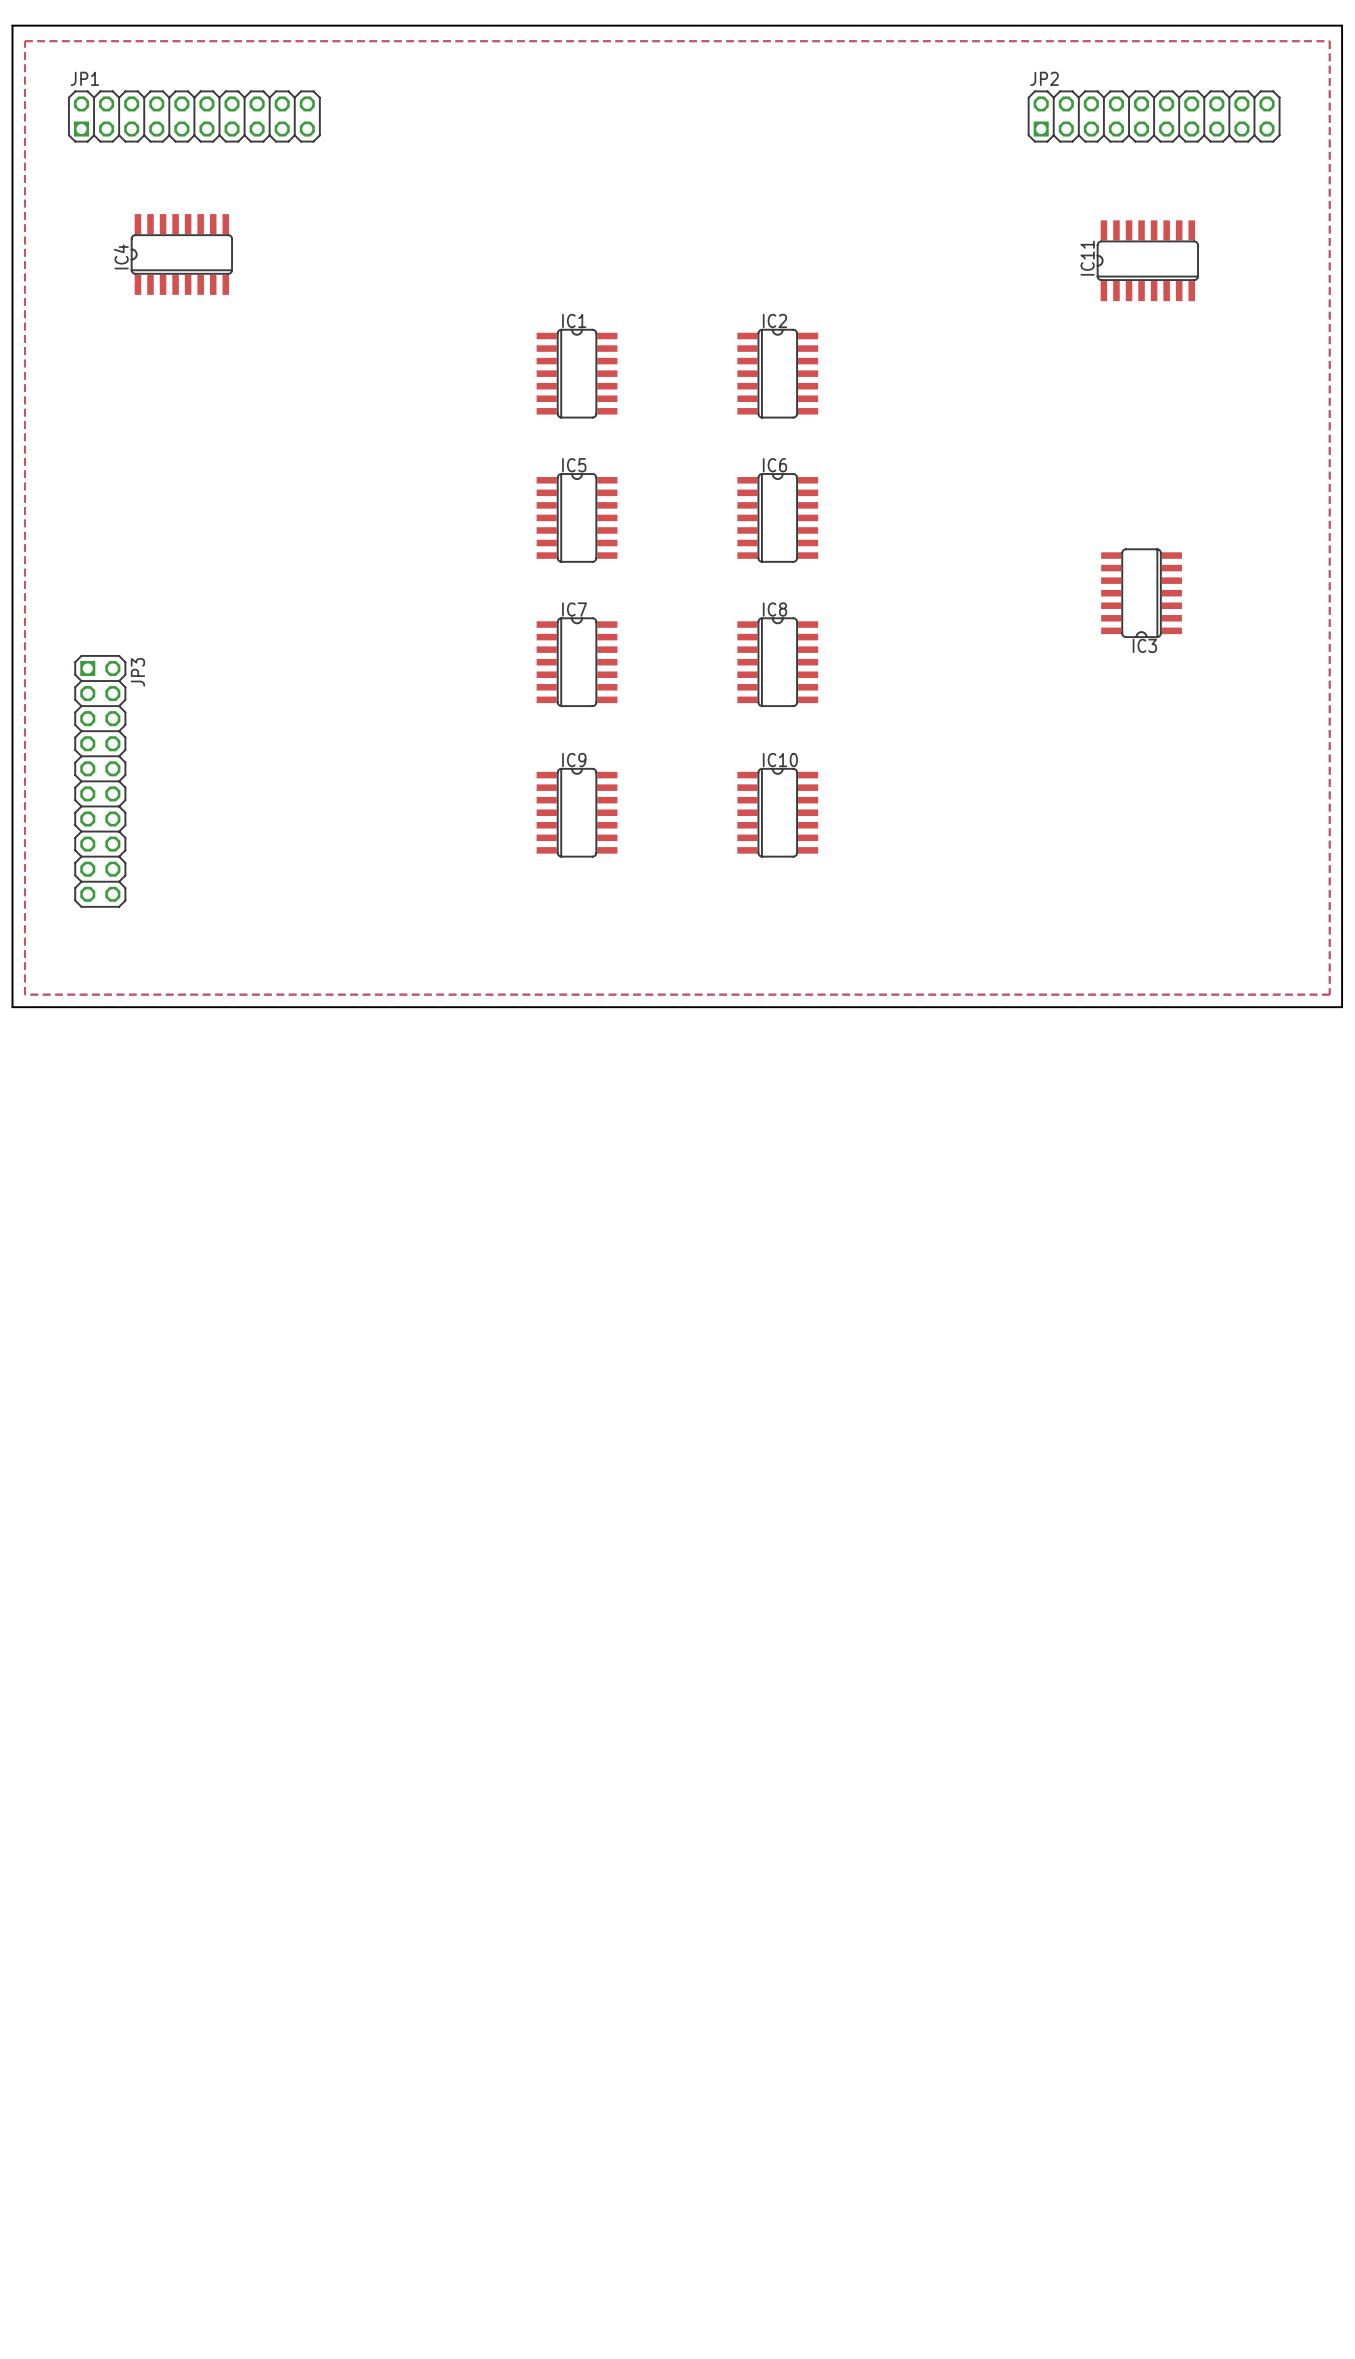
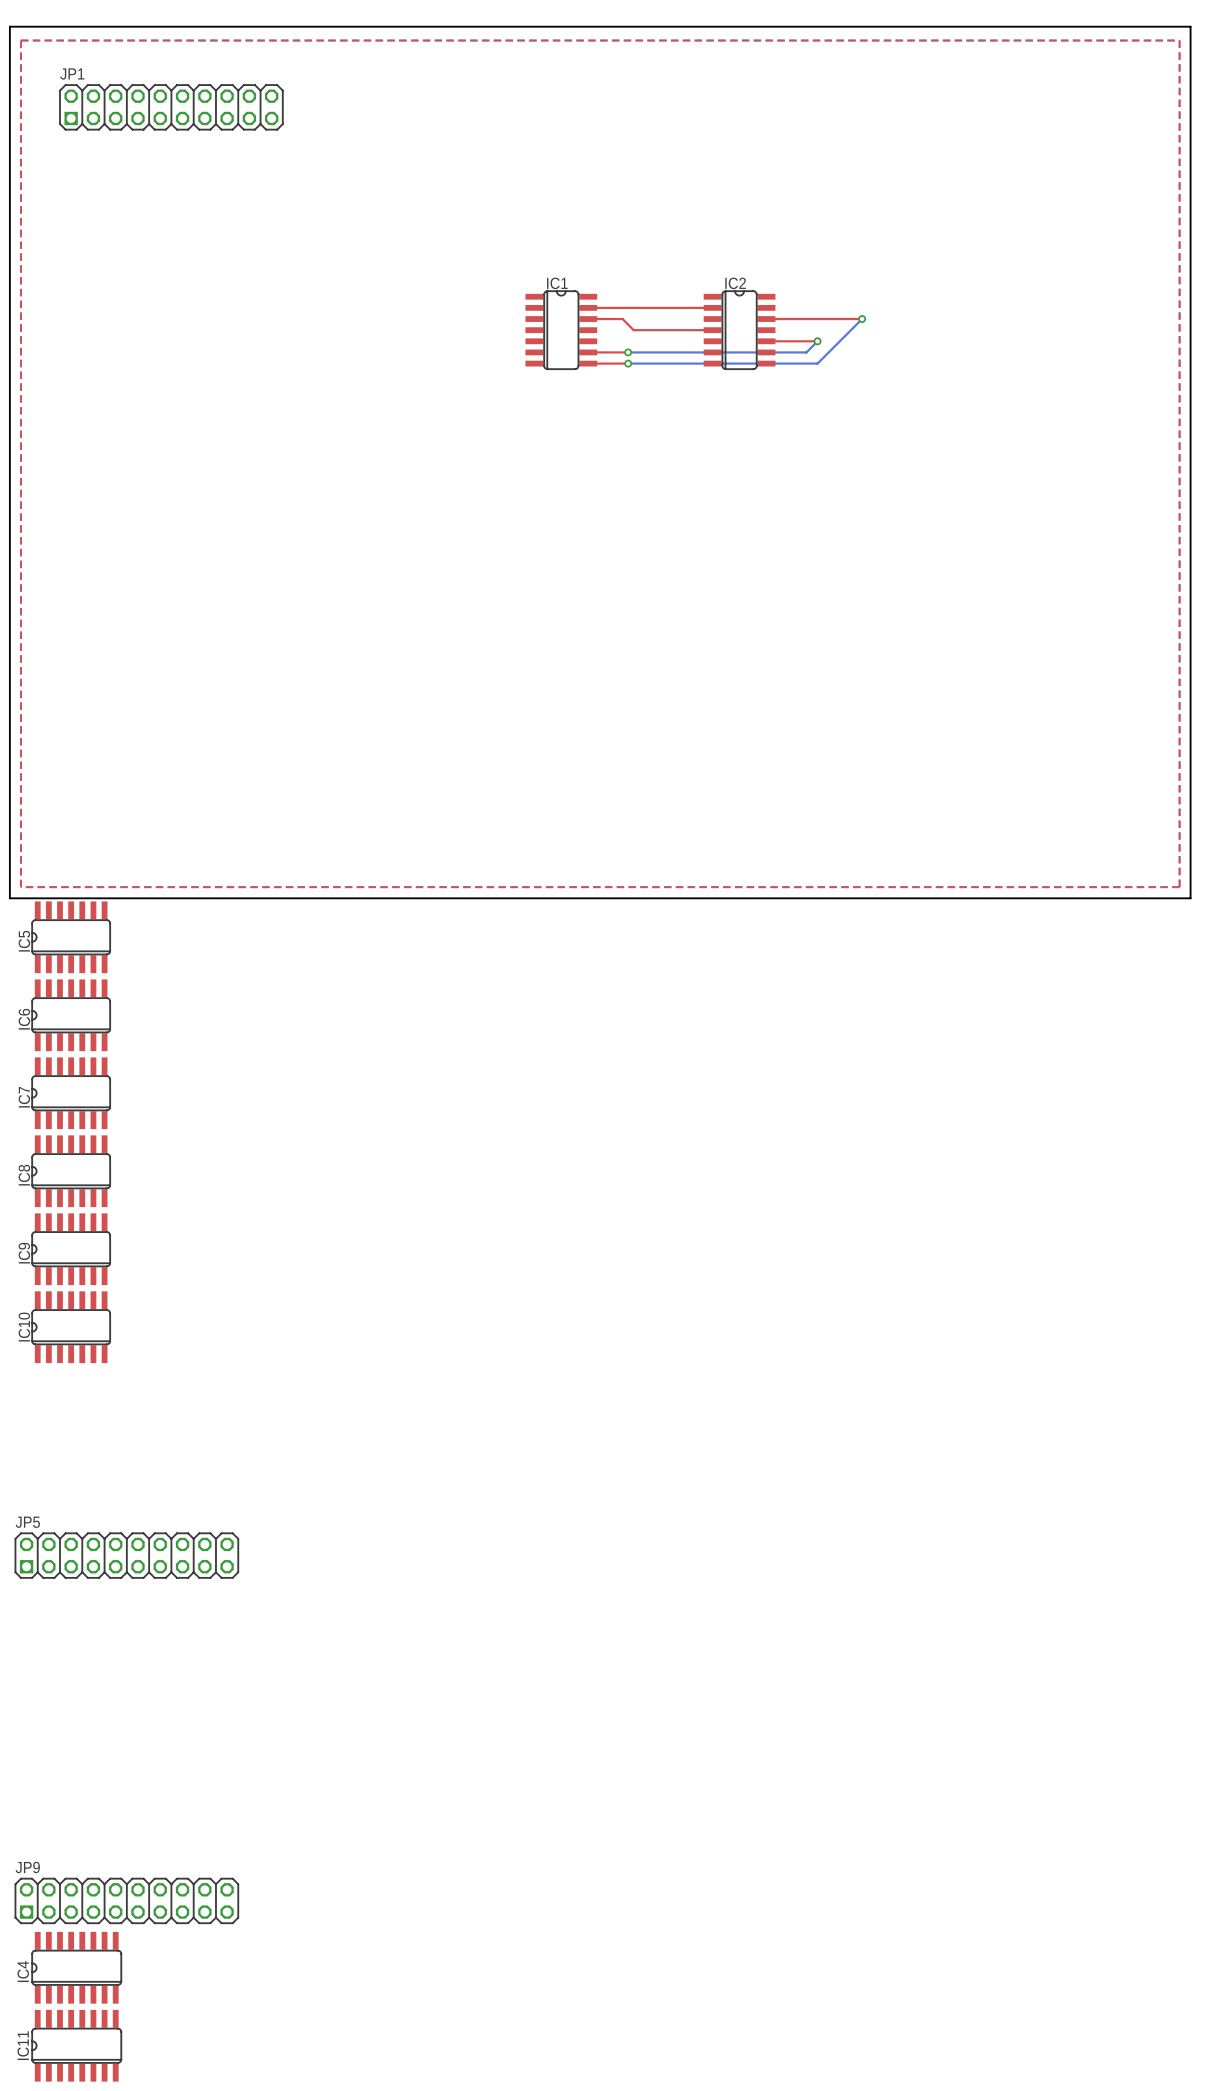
JP2: (1154, 116) -> none
IC4 position: (181, 254) -> (76, 1967)
IC11 position: (1147, 260) -> (76, 2045)
top track: none -> (588, 307) (712, 307)
top track: none -> (588, 319) (622, 319) (633, 330) (712, 330)
top track: none -> (766, 319) (862, 319)
bottom track: none -> (862, 319) (817, 363) (628, 363)
via: none -> (862, 319)
IC1 position: (577, 373) -> (561, 330)
IC2 position: (777, 373) -> (739, 330)
top track: none -> (766, 341) (817, 341)
bottom track: none -> (817, 341) (806, 352) (628, 352)
via: none -> (817, 341)
top track: none -> (588, 352) (628, 352)
via: none -> (628, 352)
top track: none -> (588, 363) (628, 363)
via: none -> (628, 363)
IC5 rotation: 0° (577, 517) -> 90° counterclockwise (71, 937)
IC5 position: (577, 517) -> (71, 937)
IC6 rotation: 0° (777, 517) -> 90° counterclockwise (71, 1015)
IC6 position: (777, 517) -> (71, 1015)
IC3: (1141, 593) -> none
IC7 rotation: 0° (577, 662) -> 90° counterclockwise (71, 1093)
IC7 position: (577, 662) -> (71, 1093)
IC8 rotation: 0° (777, 662) -> 90° counterclockwise (71, 1171)
IC8 position: (777, 662) -> (71, 1171)
JP3: (100, 781) -> none
IC9 rotation: 0° (577, 812) -> 90° counterclockwise (71, 1249)
IC9 position: (577, 812) -> (71, 1249)
IC10 rotation: 0° (777, 812) -> 90° counterclockwise (71, 1327)
IC10 position: (777, 812) -> (71, 1327)
JP5: none -> (126, 1555)
JP9: none -> (126, 1900)

